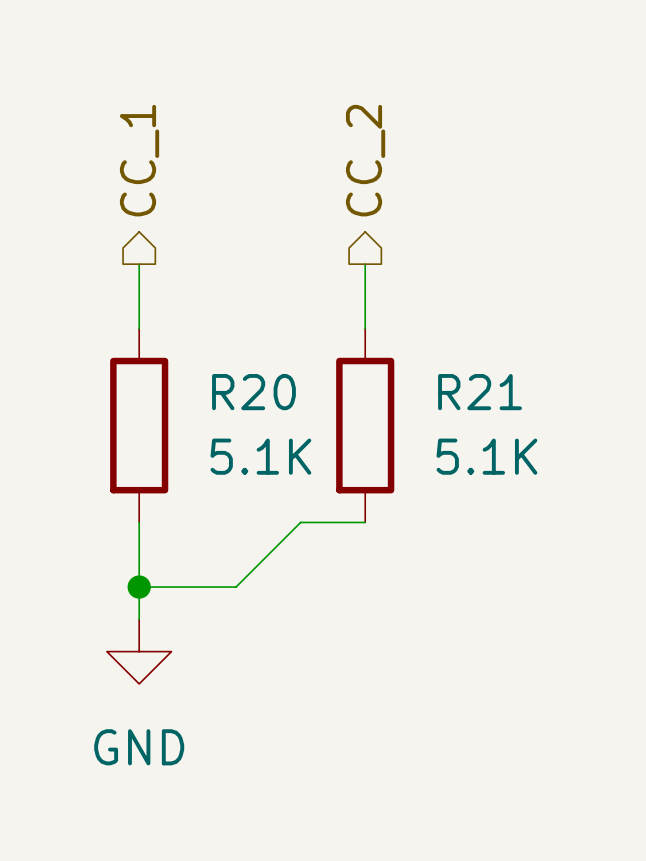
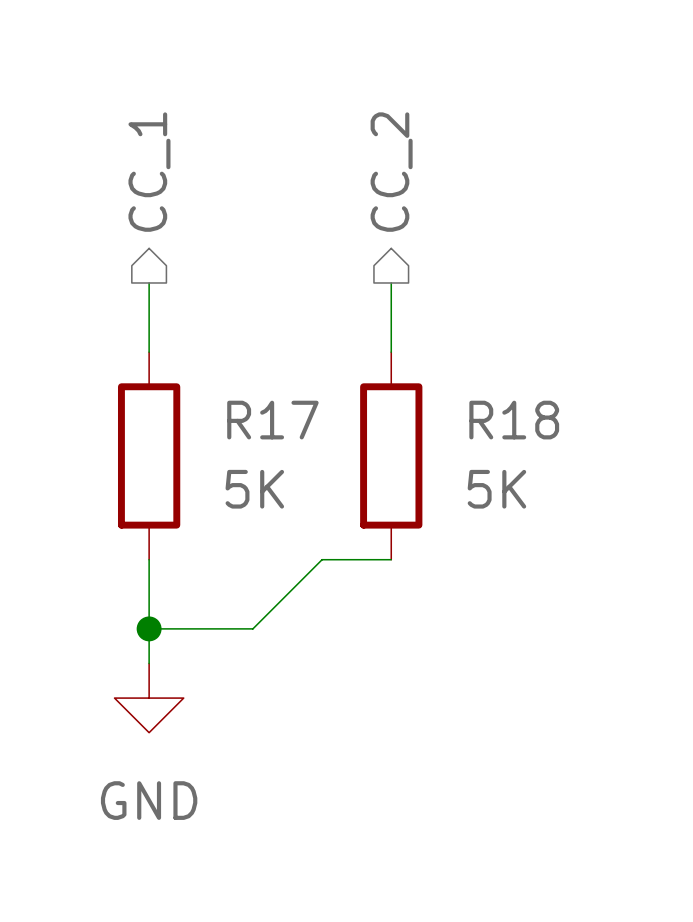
R20 name: R20 (253, 392) -> R17 (272, 420)
R21 name: R21 (480, 392) -> R18 (514, 420)
R20 value: 5.1K (260, 456) -> 5K (254, 489)
R21 value: 5.1K (486, 456) -> 5K (496, 489)

